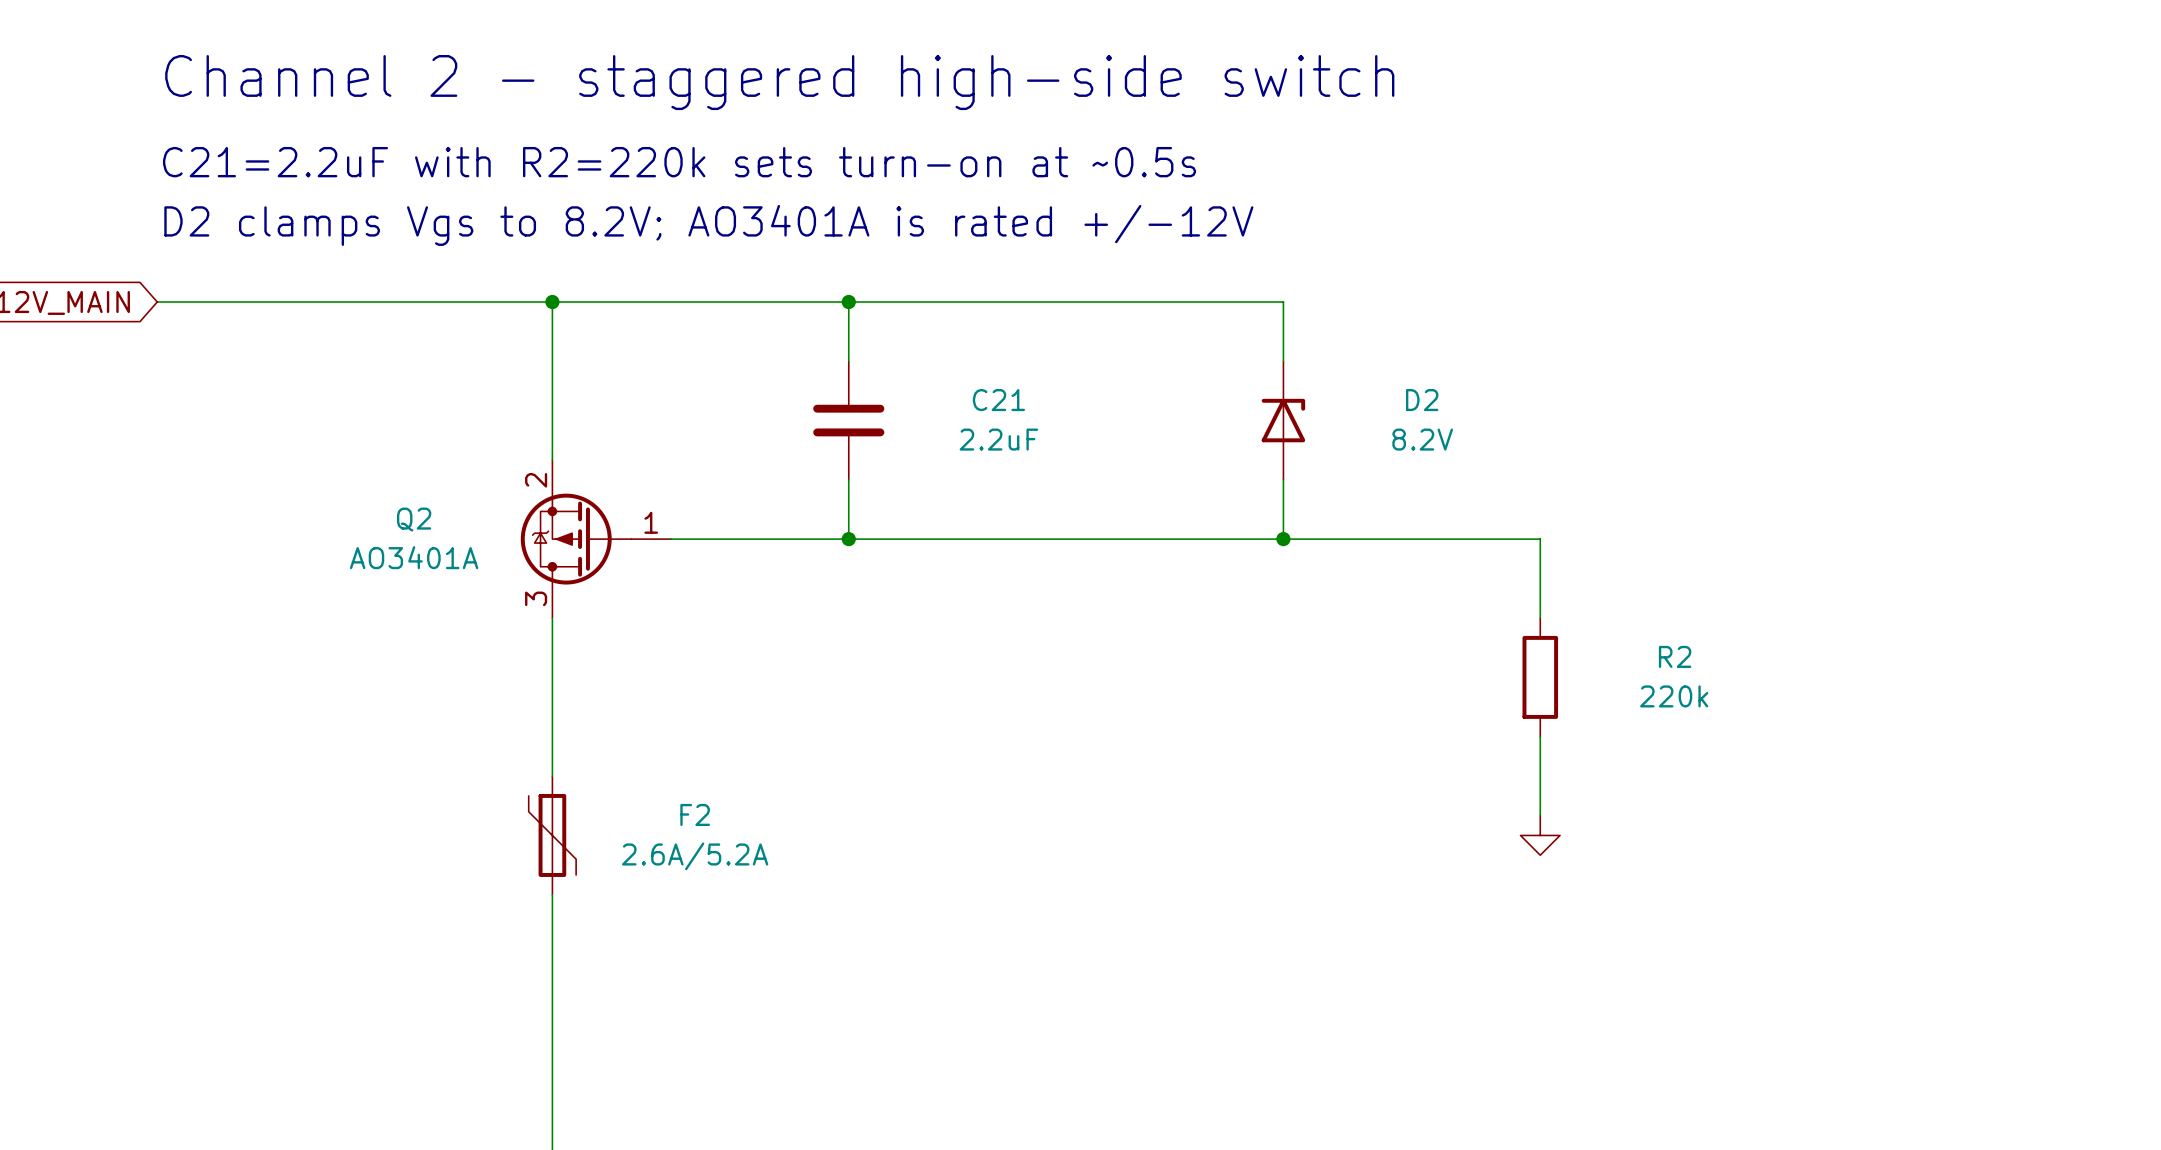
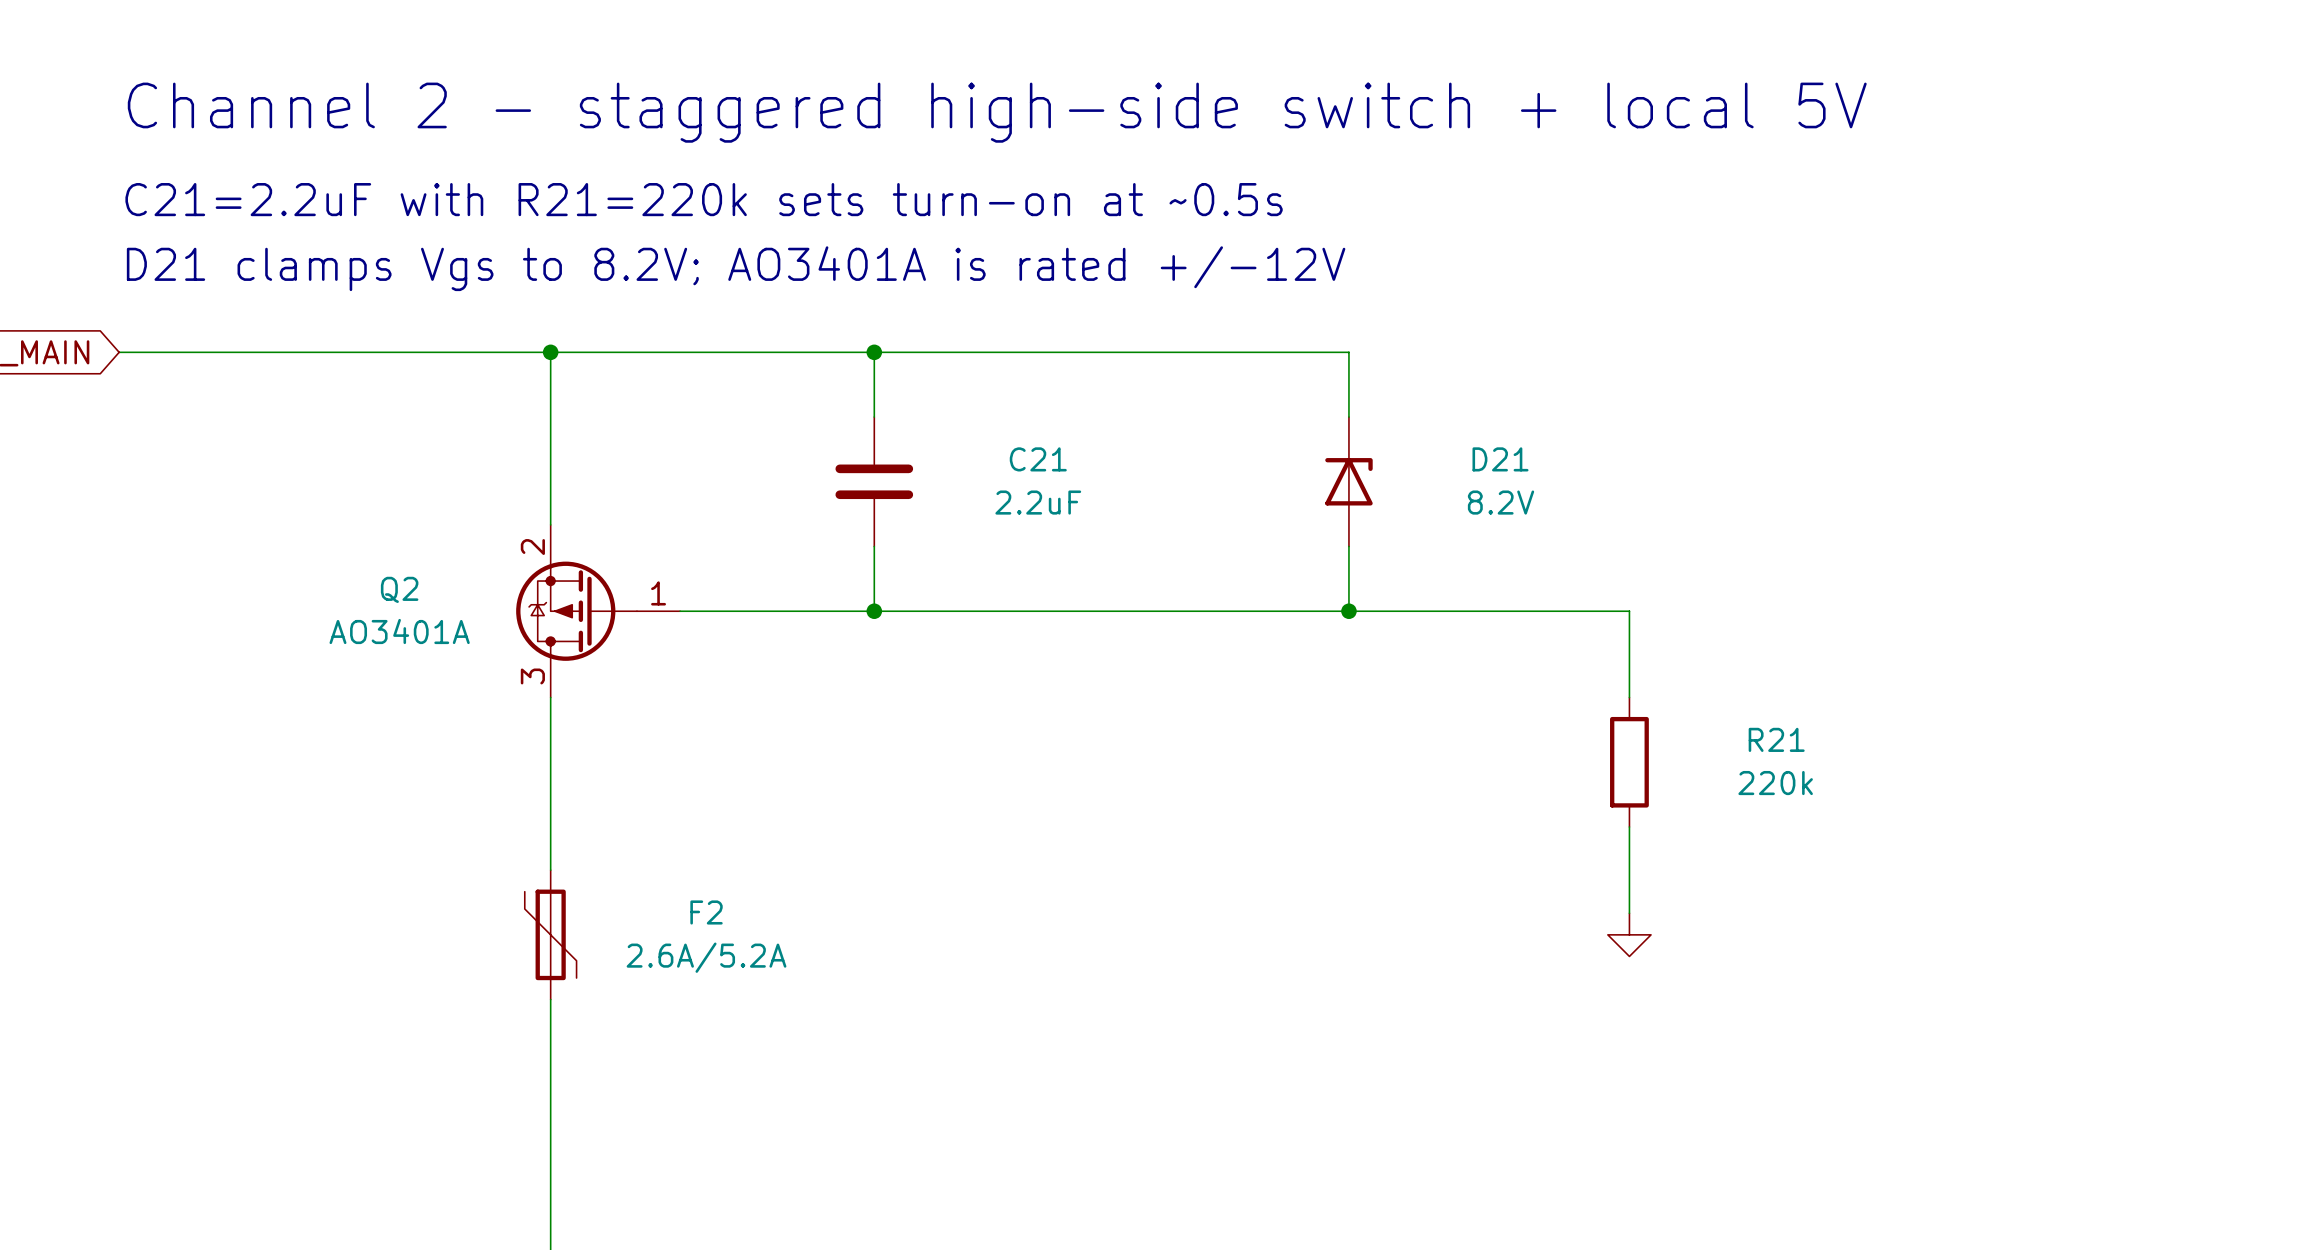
text: Channel 2 - staggered high-side switch (779, 82) -> Channel 2 - staggered high-side switch + local 5V (997, 112)
text: C21=2.2uF with R2=220k sets turn-on at ~0.5s (679, 162) -> C21=2.2uF with R21=220k sets turn-on at ~0.5s (704, 199)
text: D2 clamps Vgs to 8.2V; AO3401A is rated +/-12V (708, 225) -> D21 clamps Vgs to 8.2V; AO3401A is rated +/-12V (736, 268)
D2 name: D2 (1422, 400) -> D21 (1500, 459)
R2 name: R2 (1675, 656) -> R21 (1776, 739)

